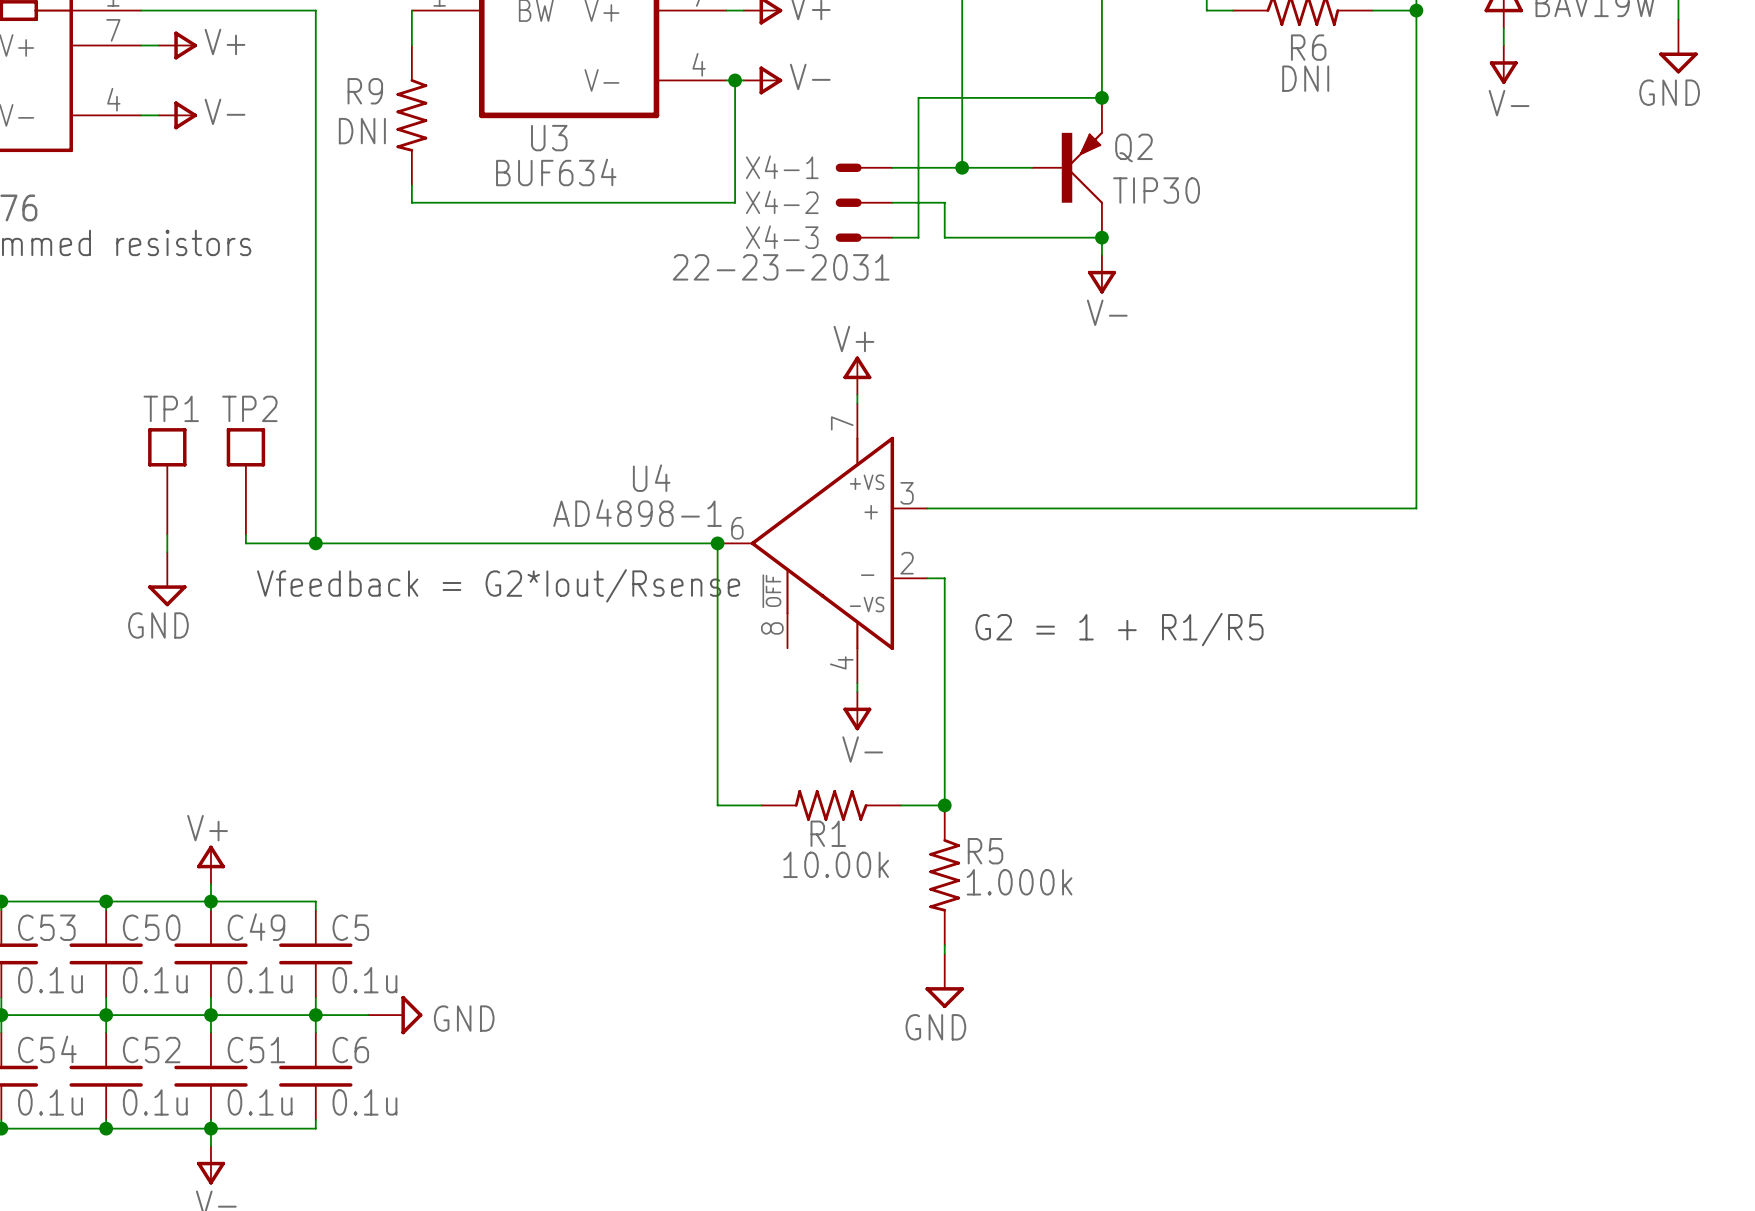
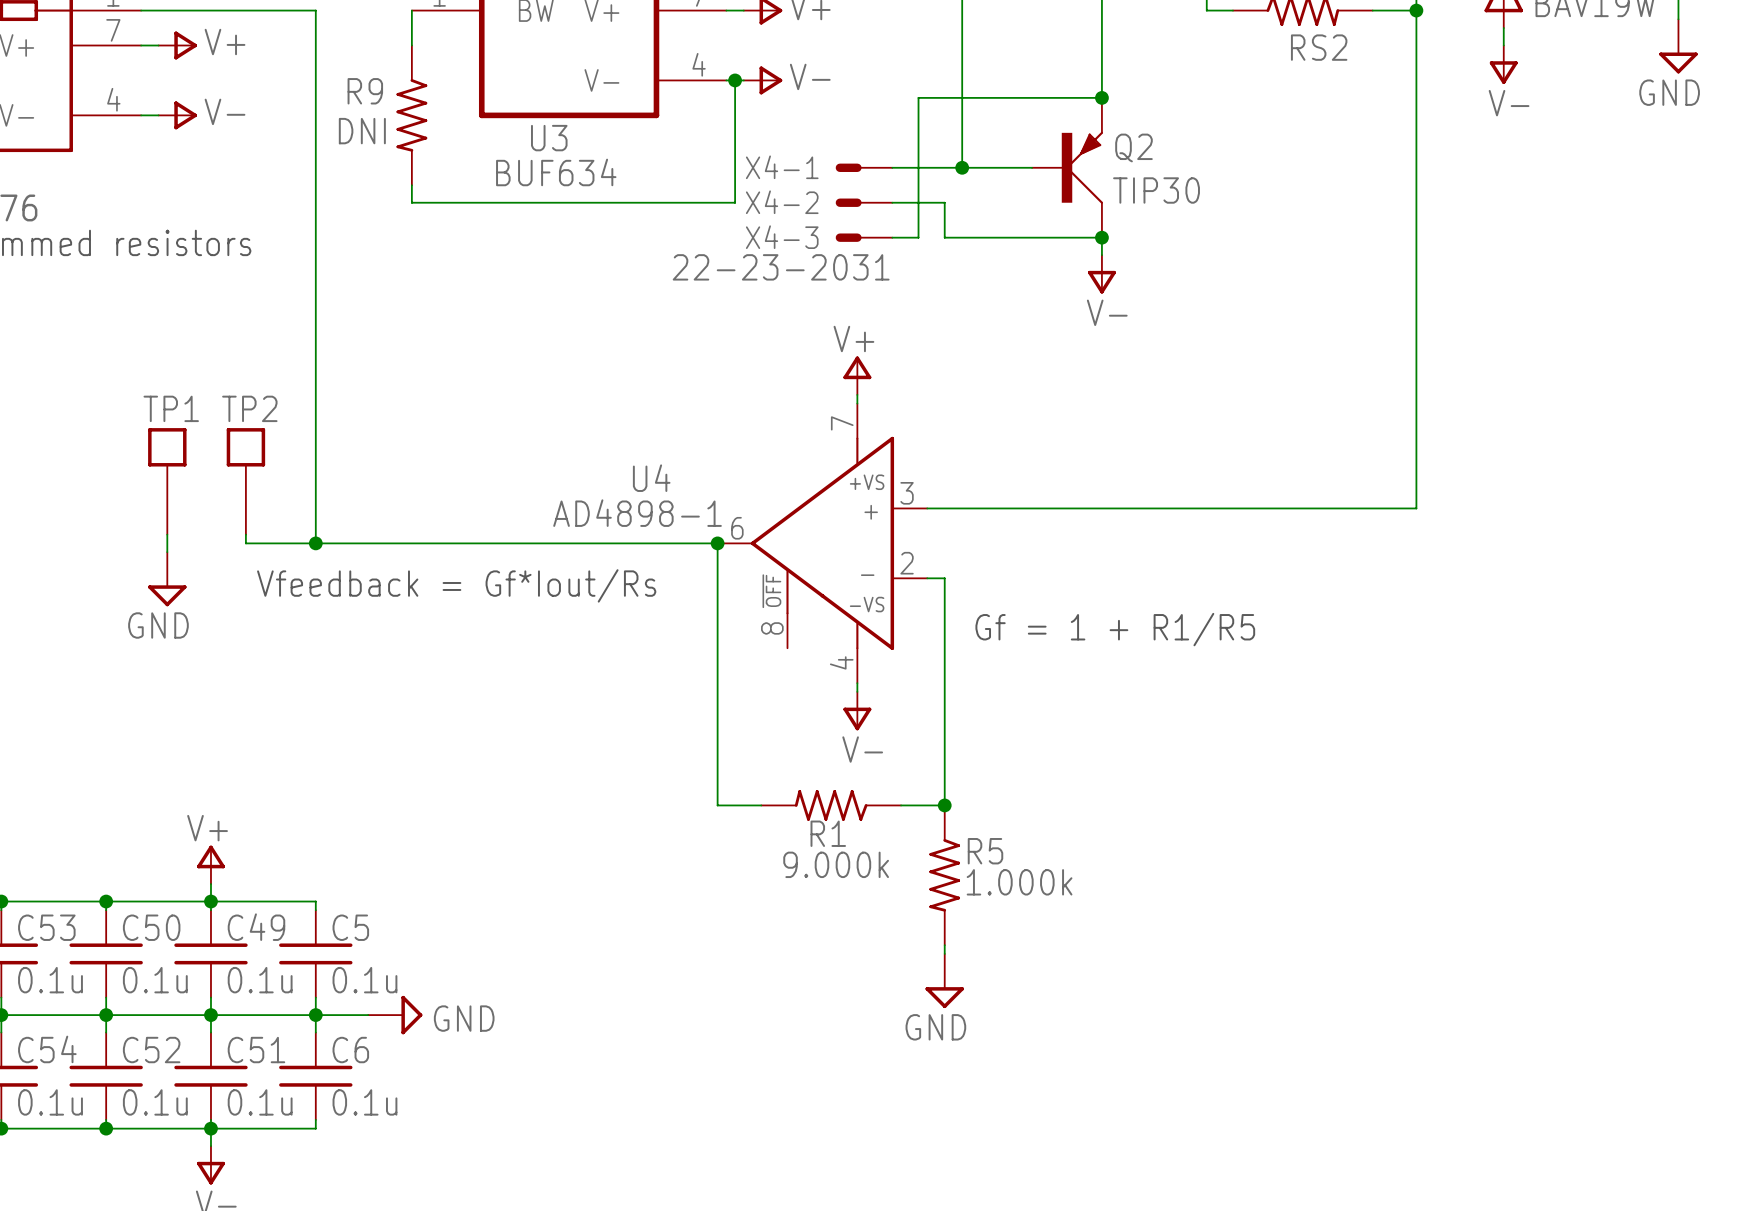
R6 name: R6 (1308, 47) -> RS2 (1319, 47)
R6 value: DNI (1305, 78) -> none
text: Vfeedback = G2*Iout/Rsense (498, 585) -> Vfeedback = Gf*Iout/Rs (456, 585)
text: G2 = 1 + R1/R5 (1119, 629) -> Gf = 1 + R1/R5 (1115, 629)
R1 value: 10.00k (836, 864) -> 9.000k (836, 864)

